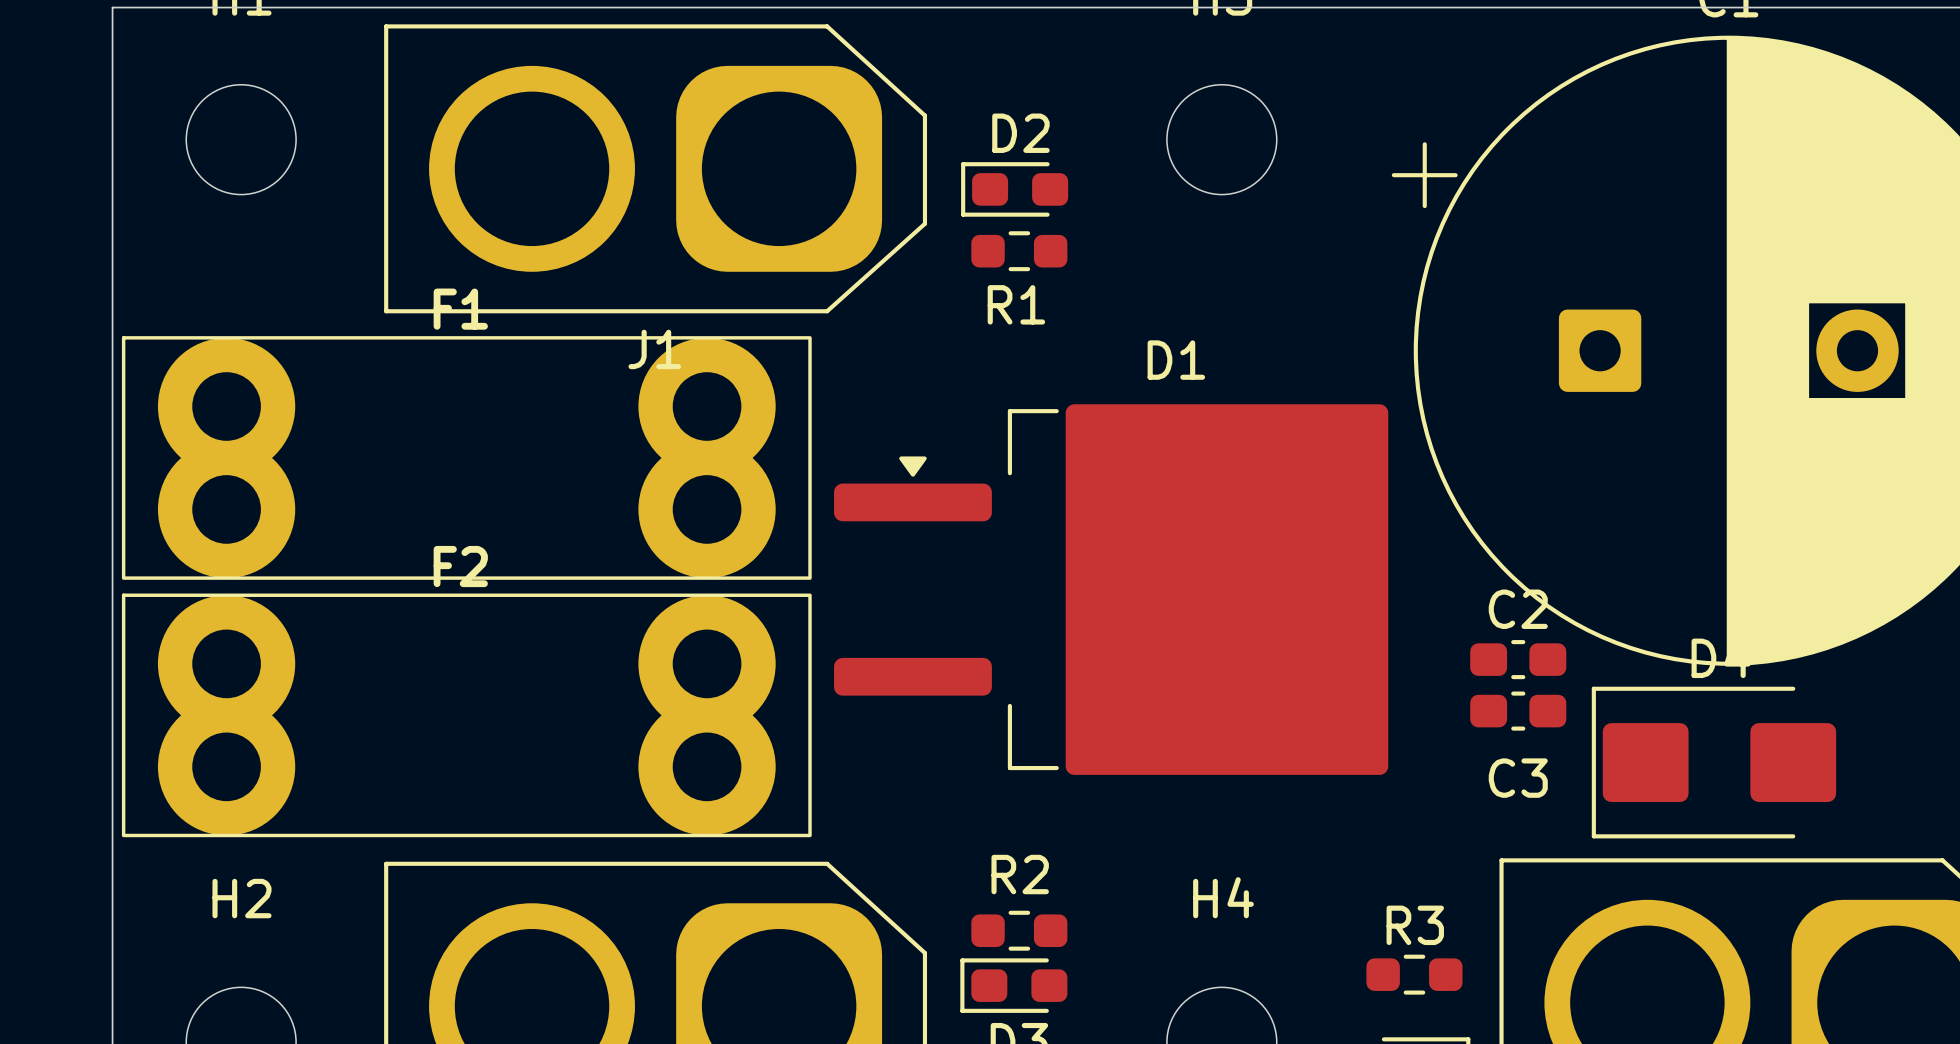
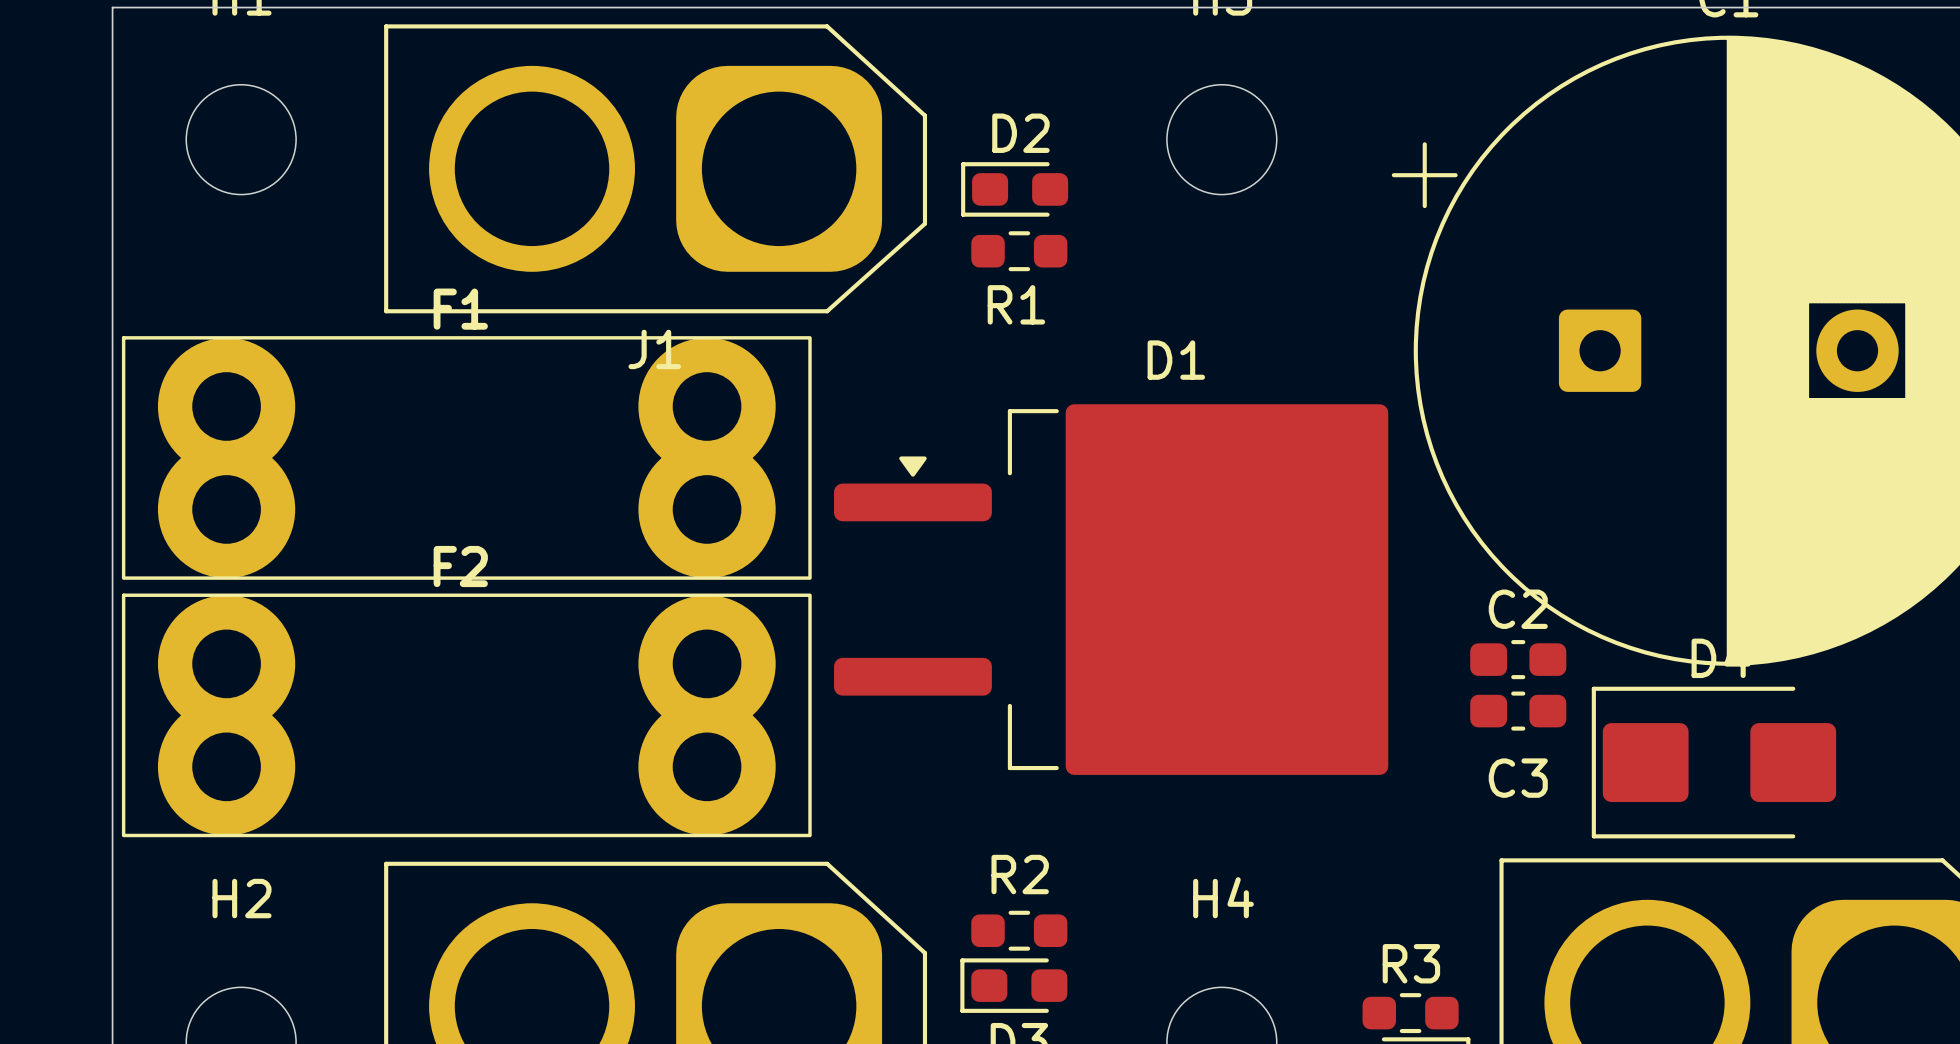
R3 position: (1414, 974) -> (1410, 1013)

